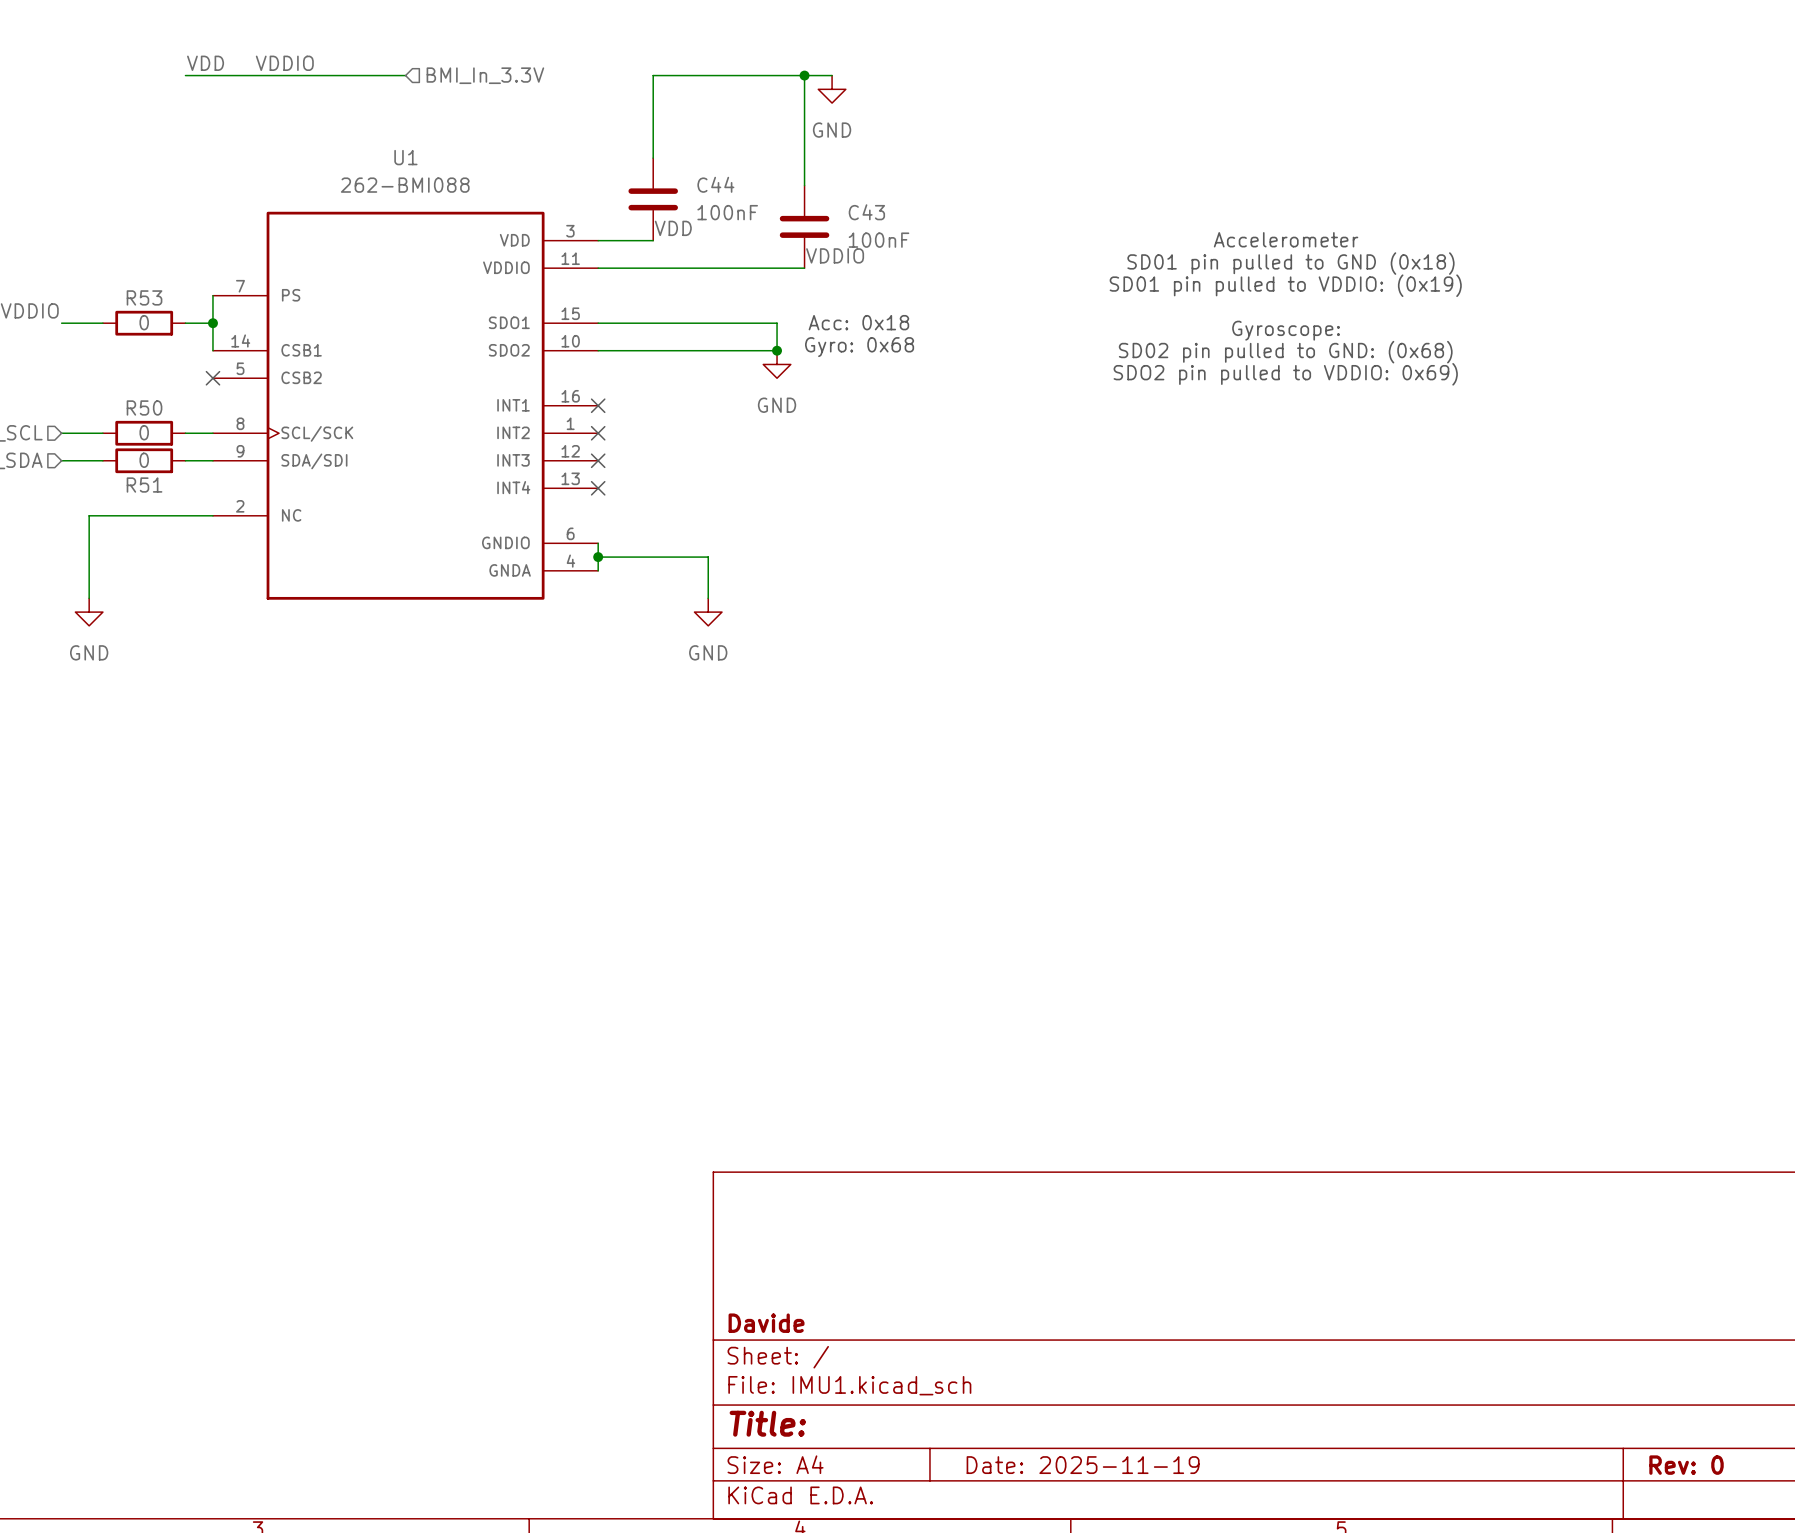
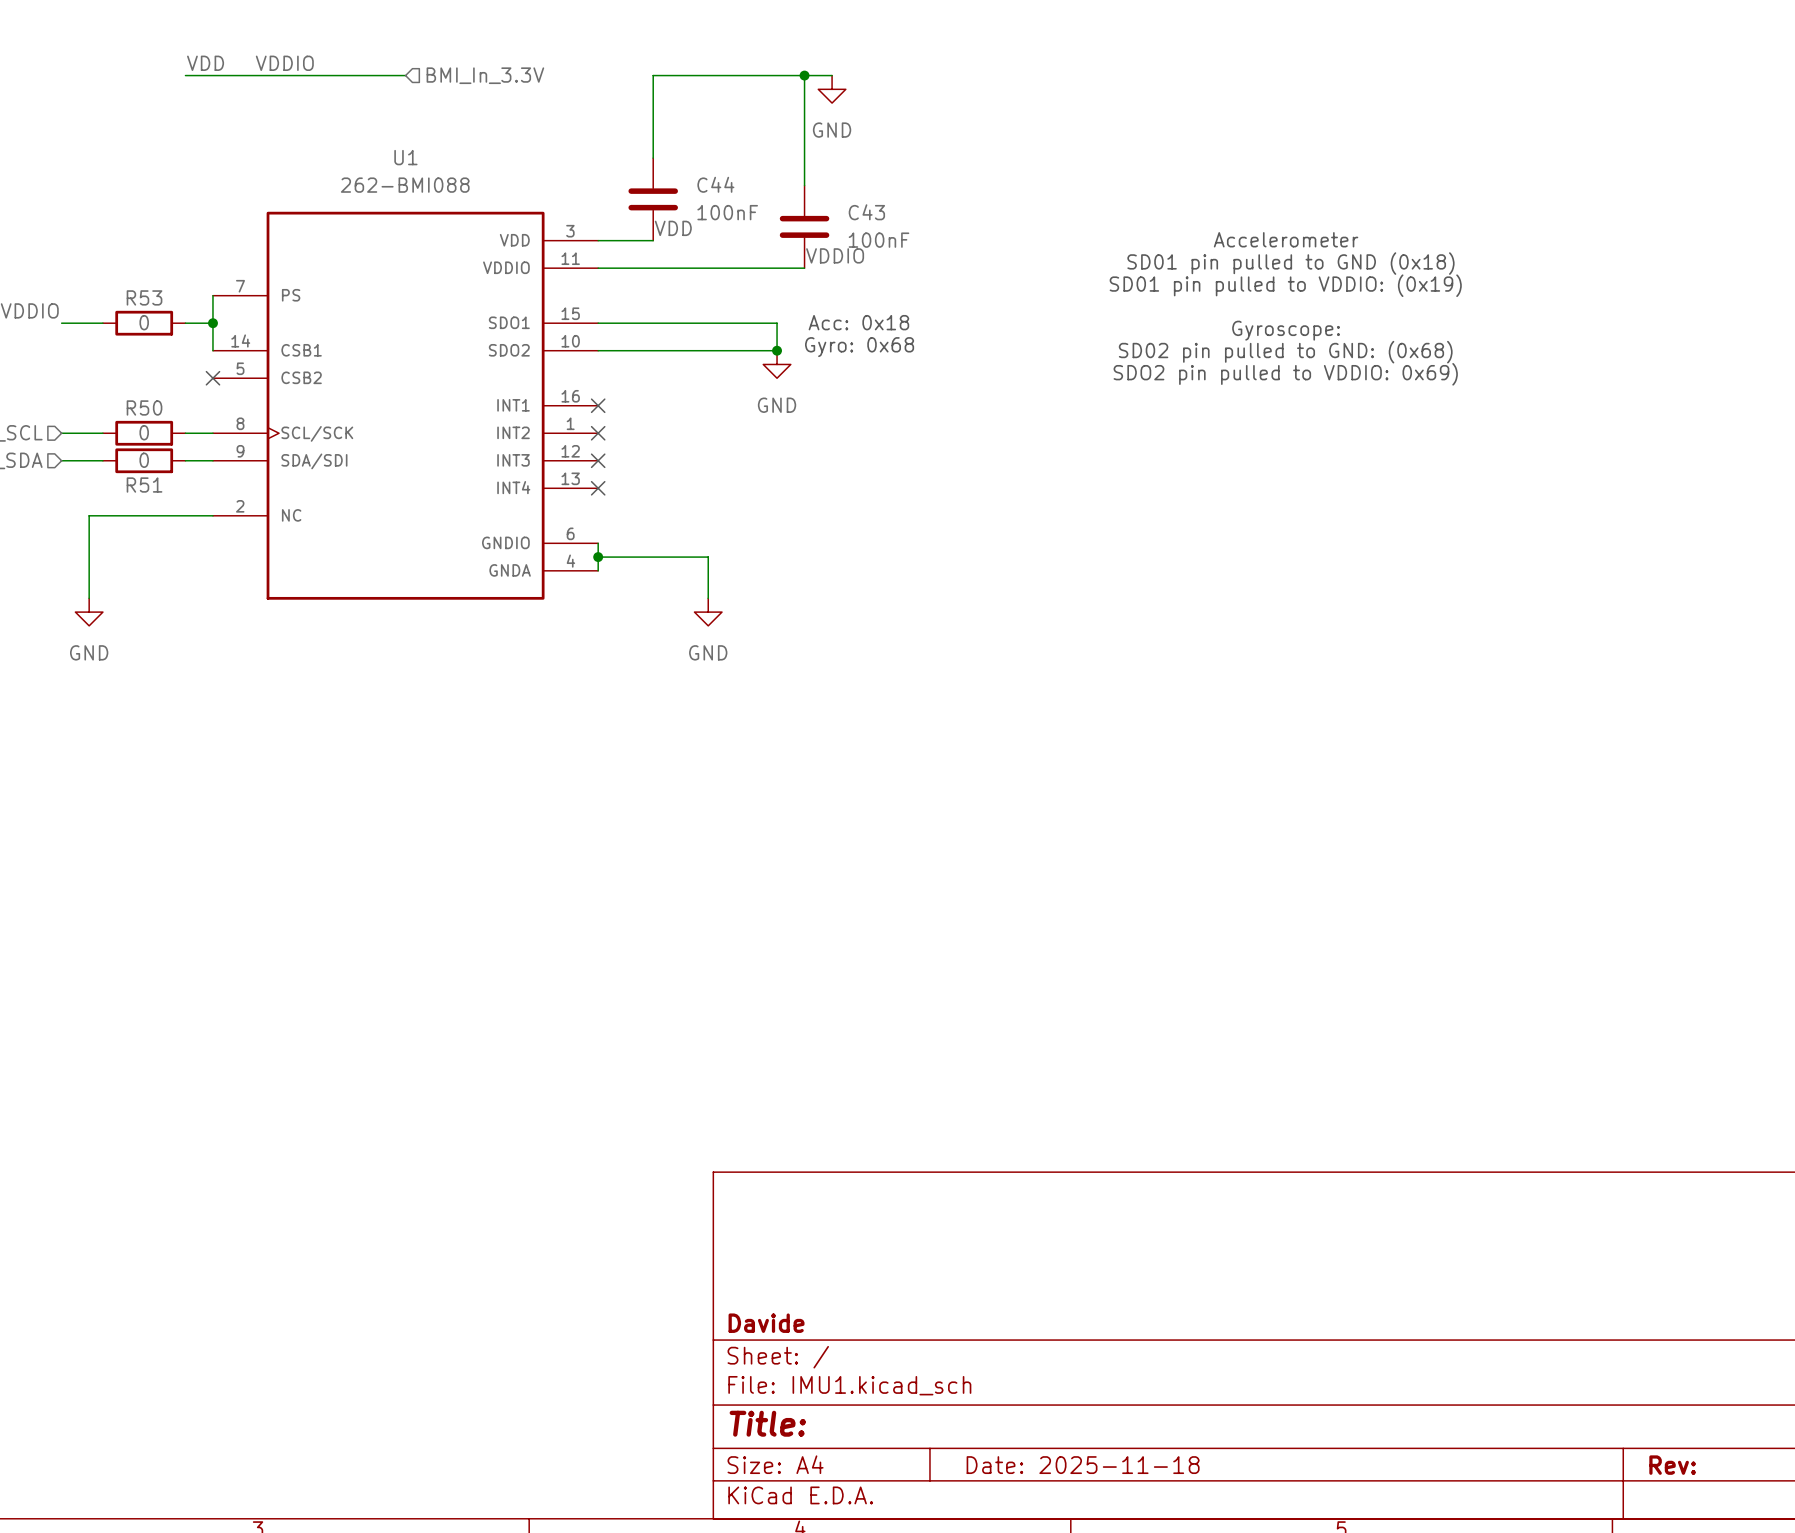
title block: Date: 2025-11-19 (1083, 1465) -> Date: 2025-11-18 (1083, 1465)
title block: Rev: 0 (1686, 1465) -> Rev: (1672, 1465)

